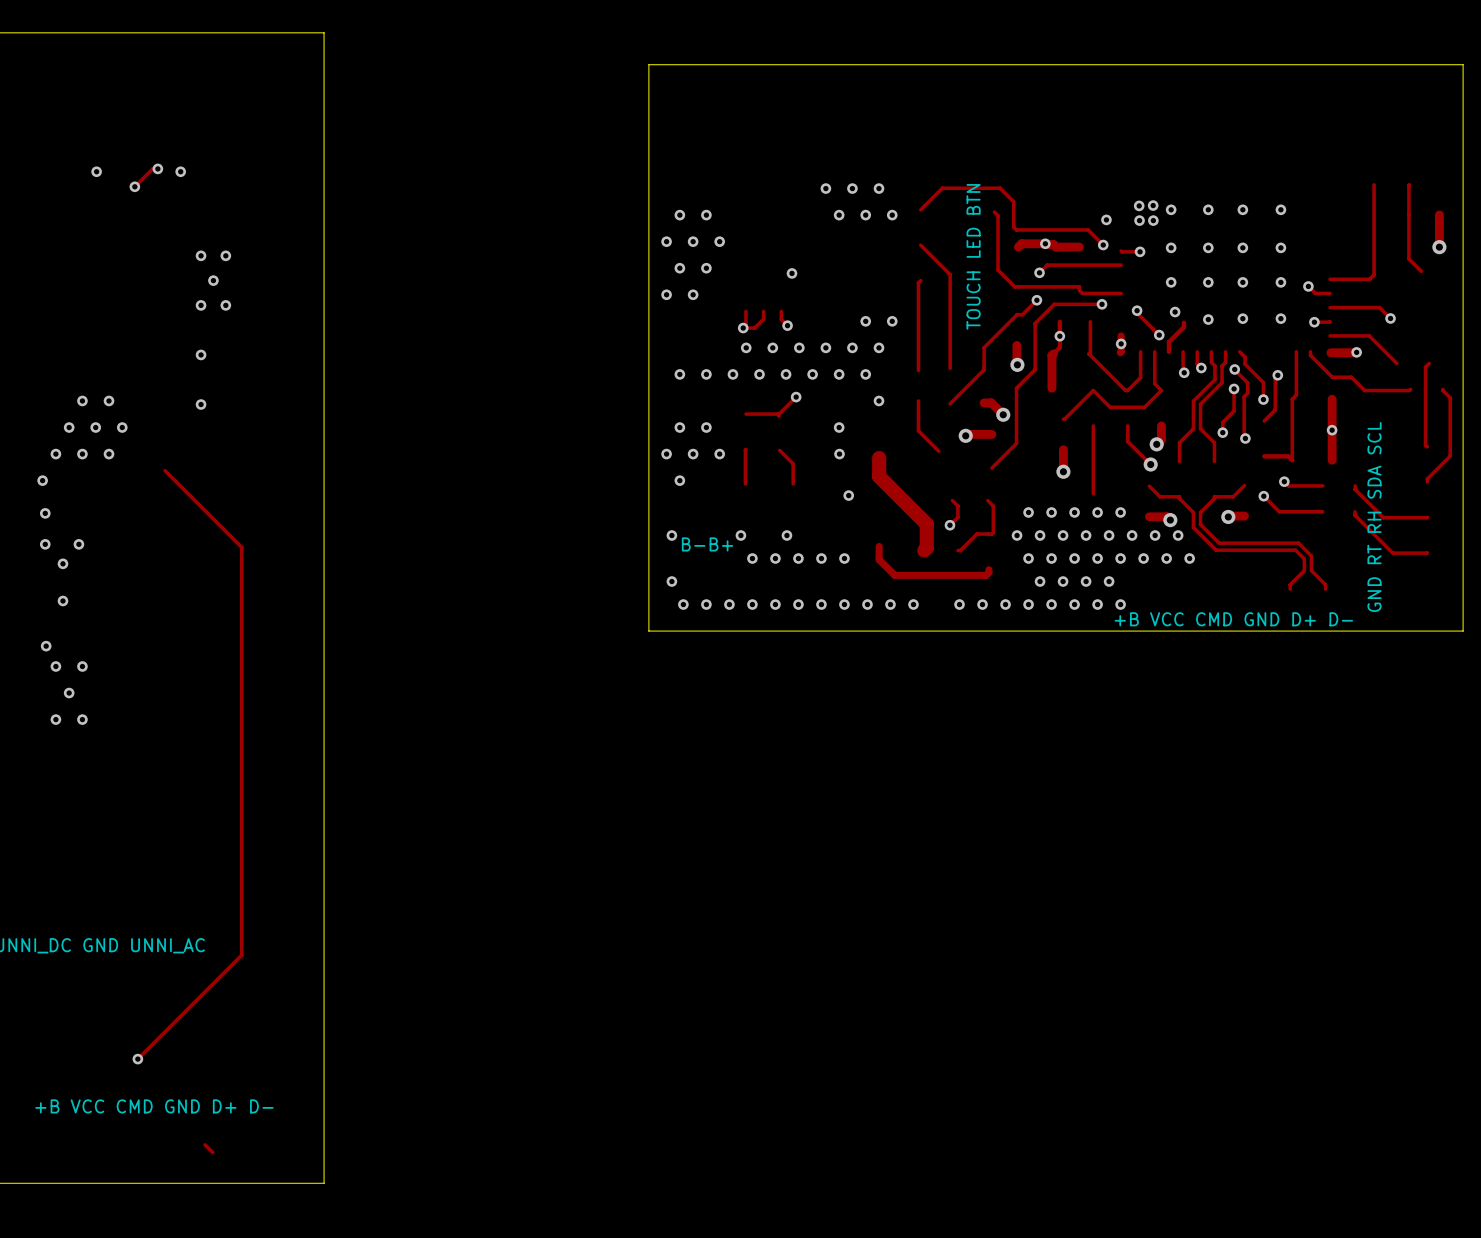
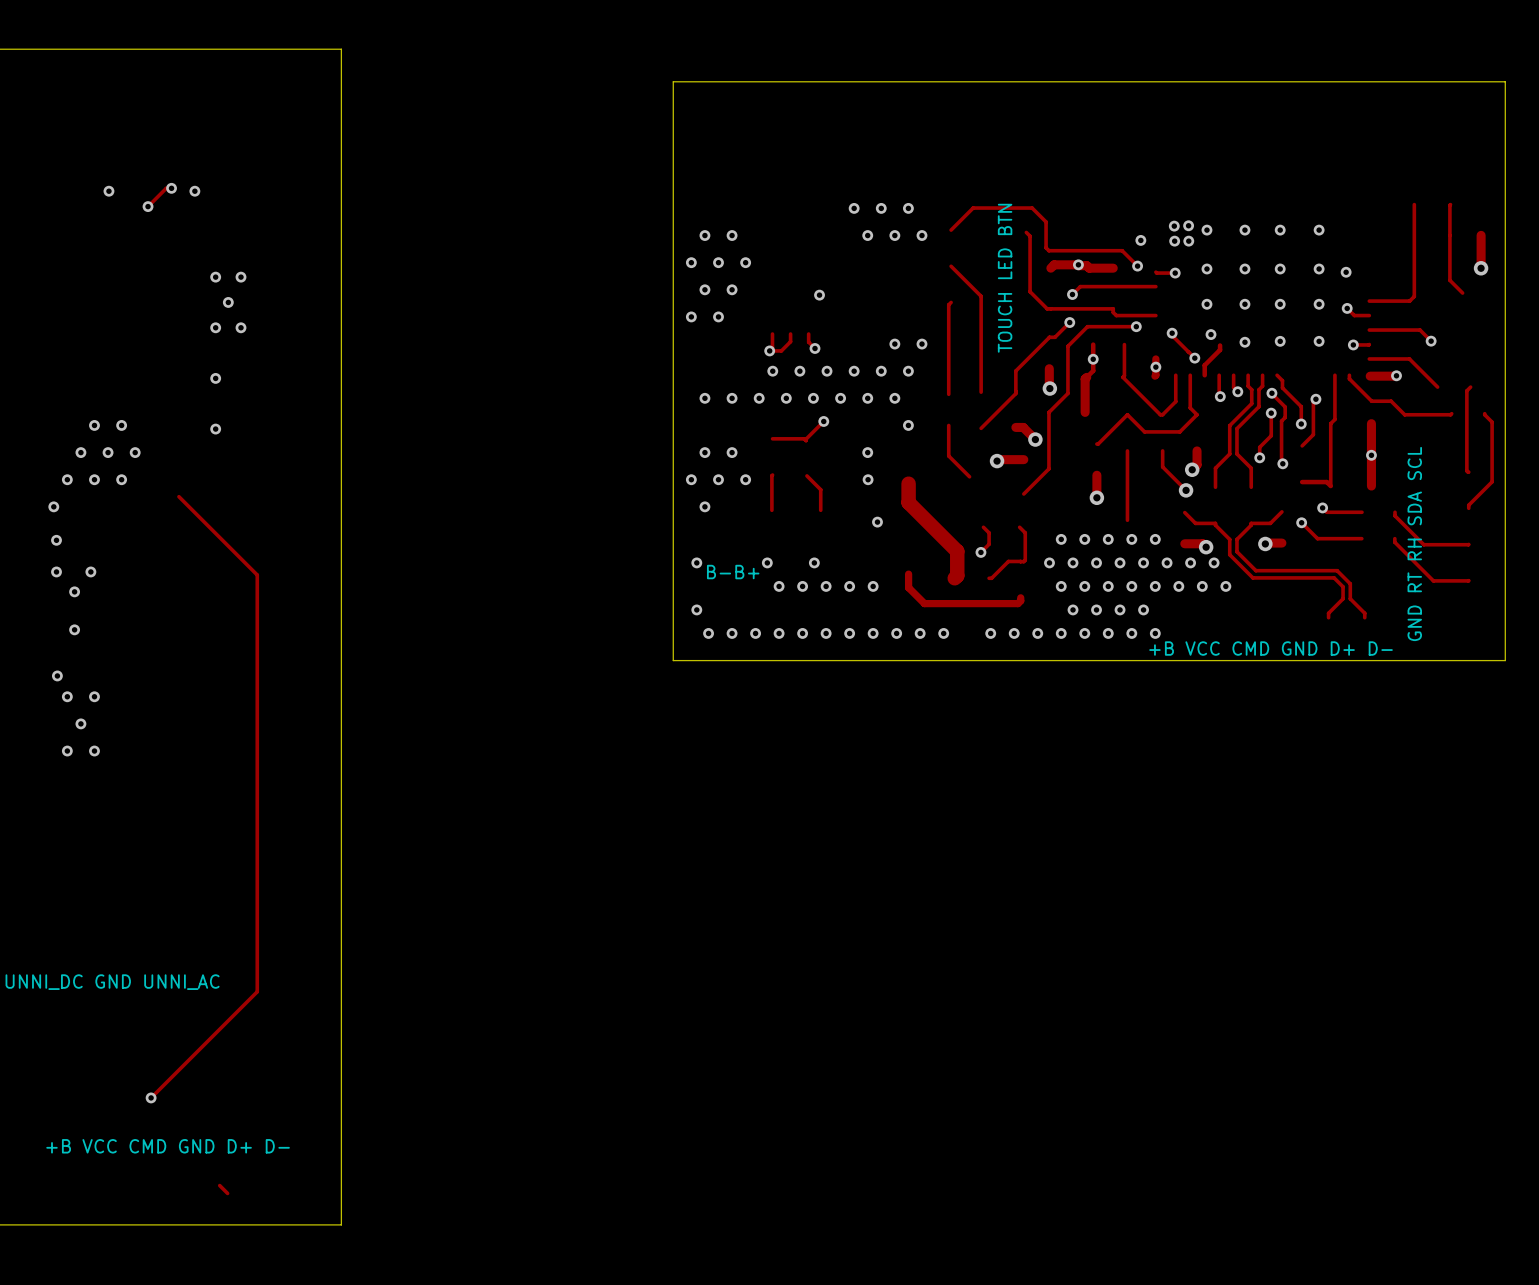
via: none -> (1346, 272)

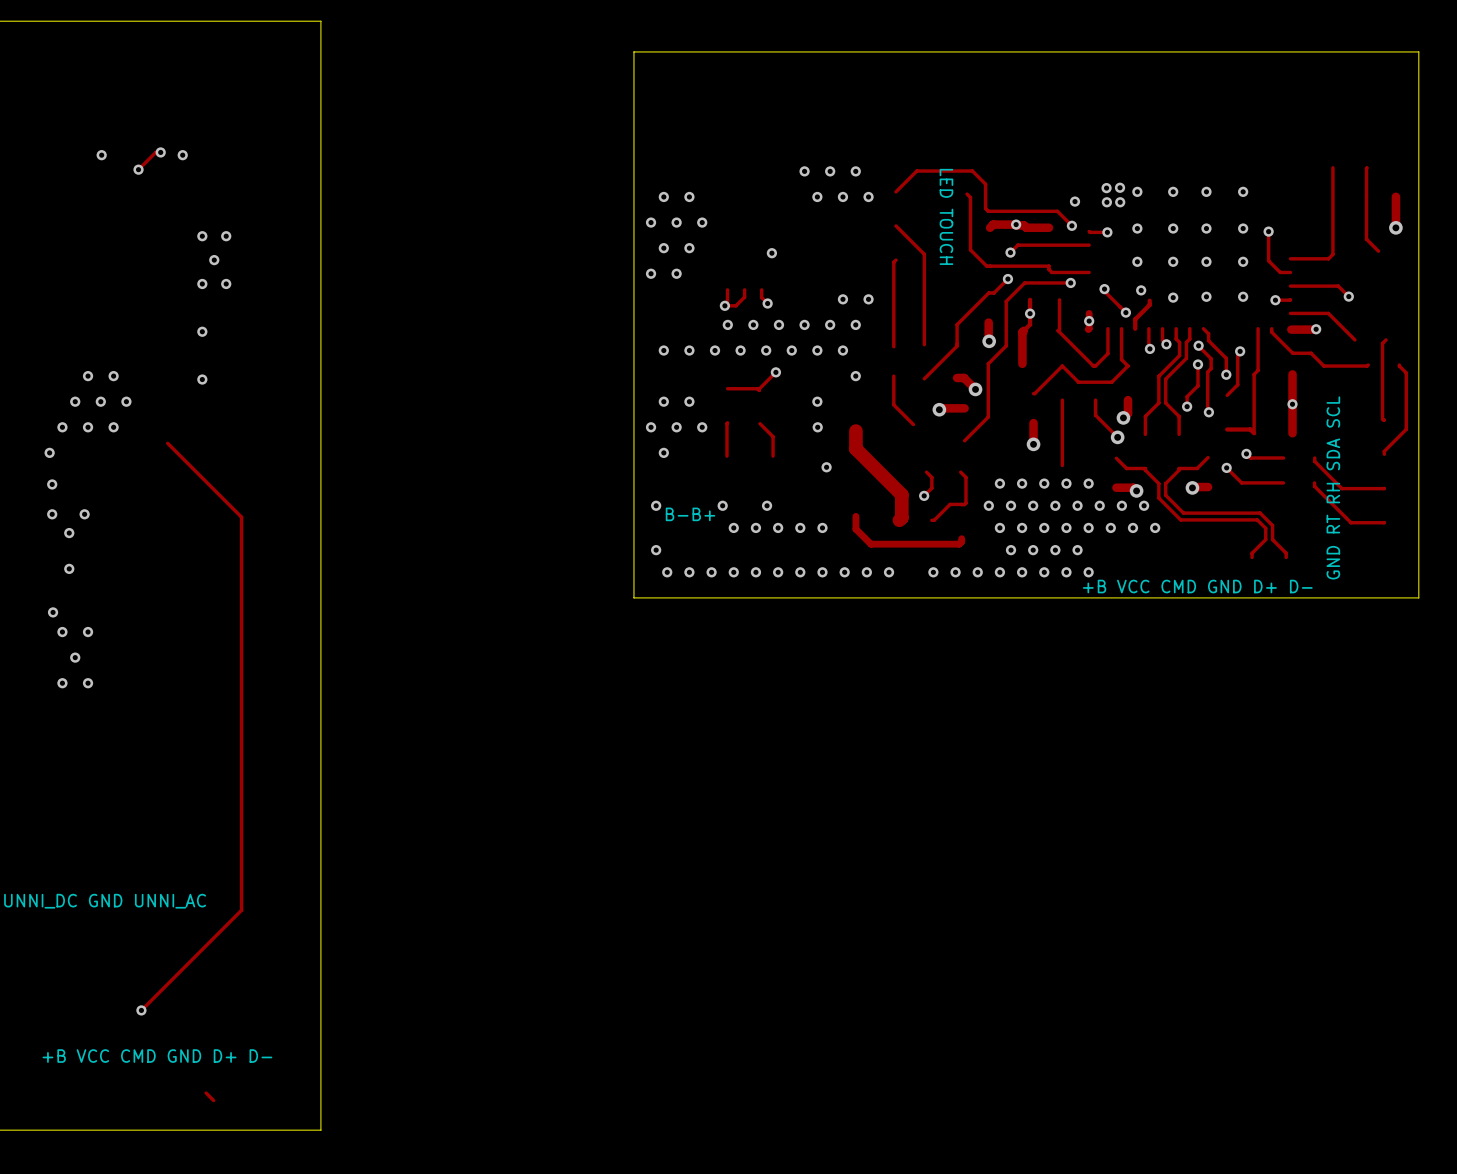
text: none -> LED TOUCH (946, 216)
text: TOUCH LED BTN (1005, 278) -> none
track: (1347, 308) (1354, 315) (1358, 315) -> (1268, 231) (1268, 260) (1280, 272)
via: (1347, 308) -> none

